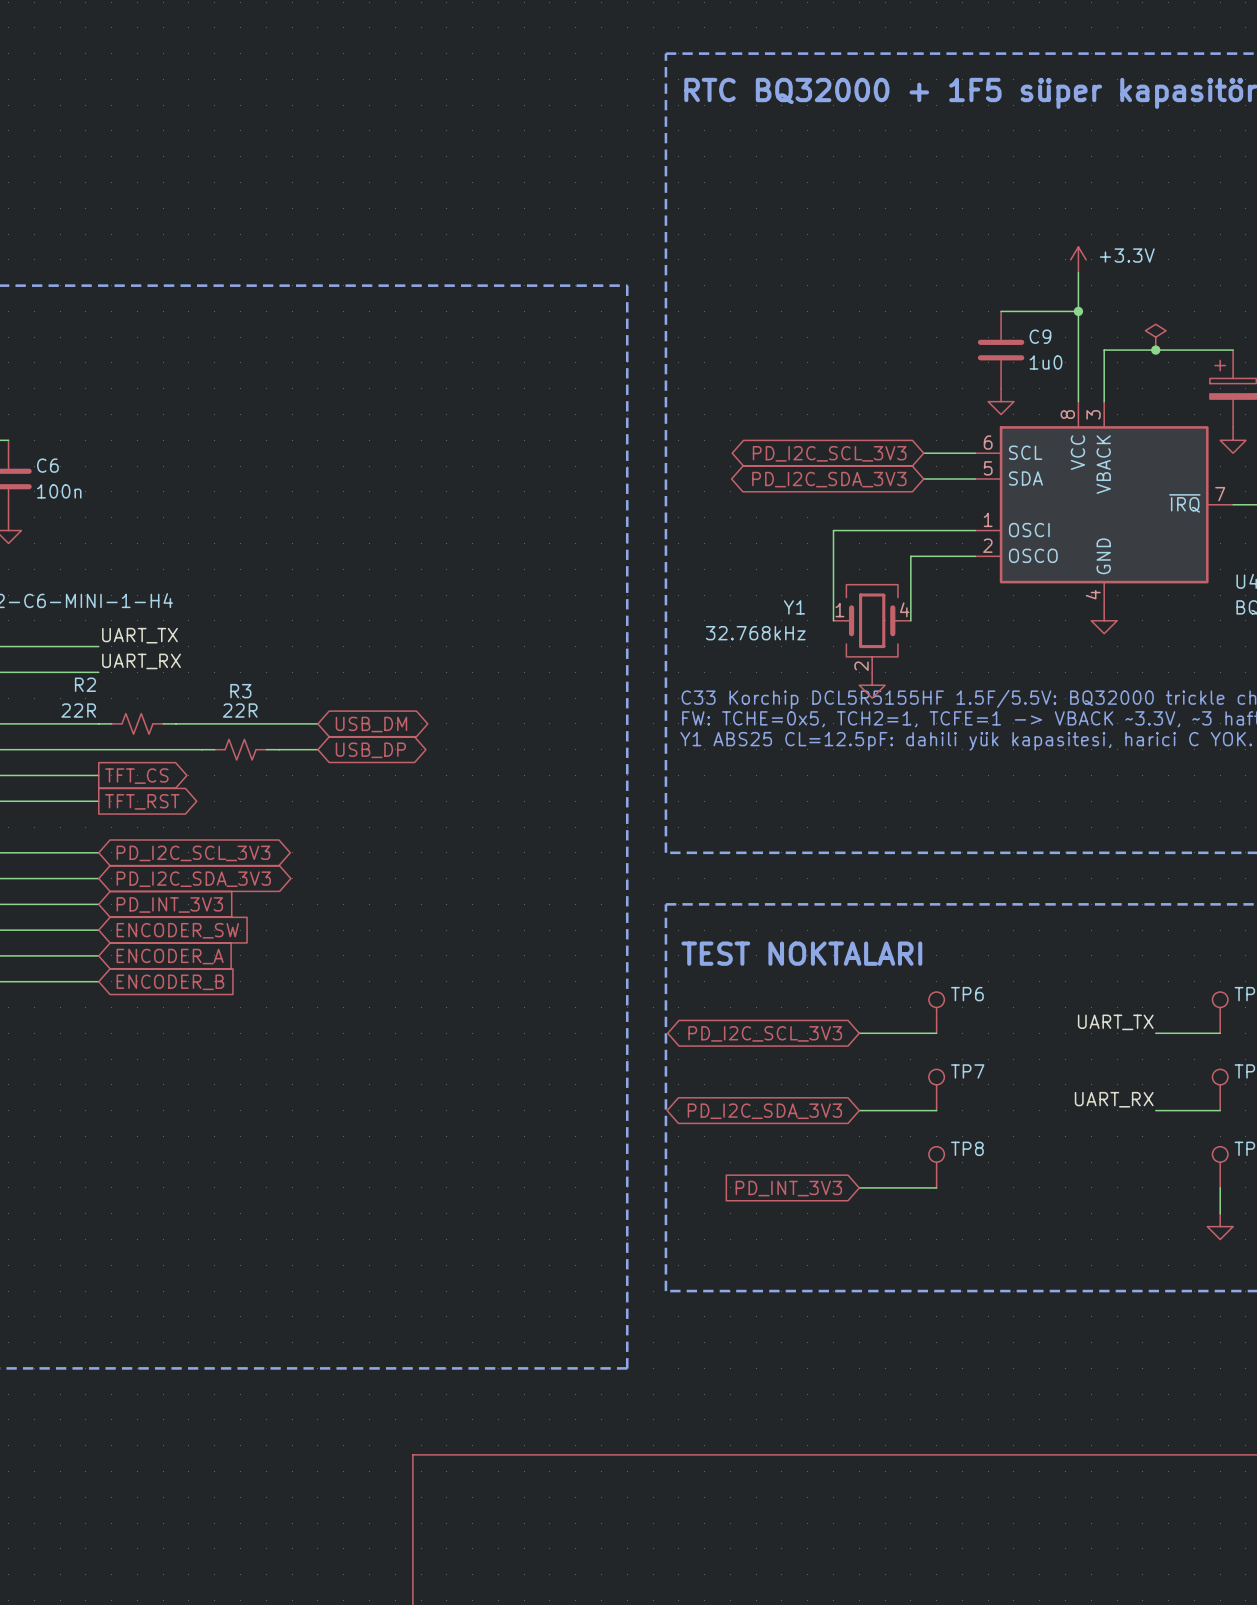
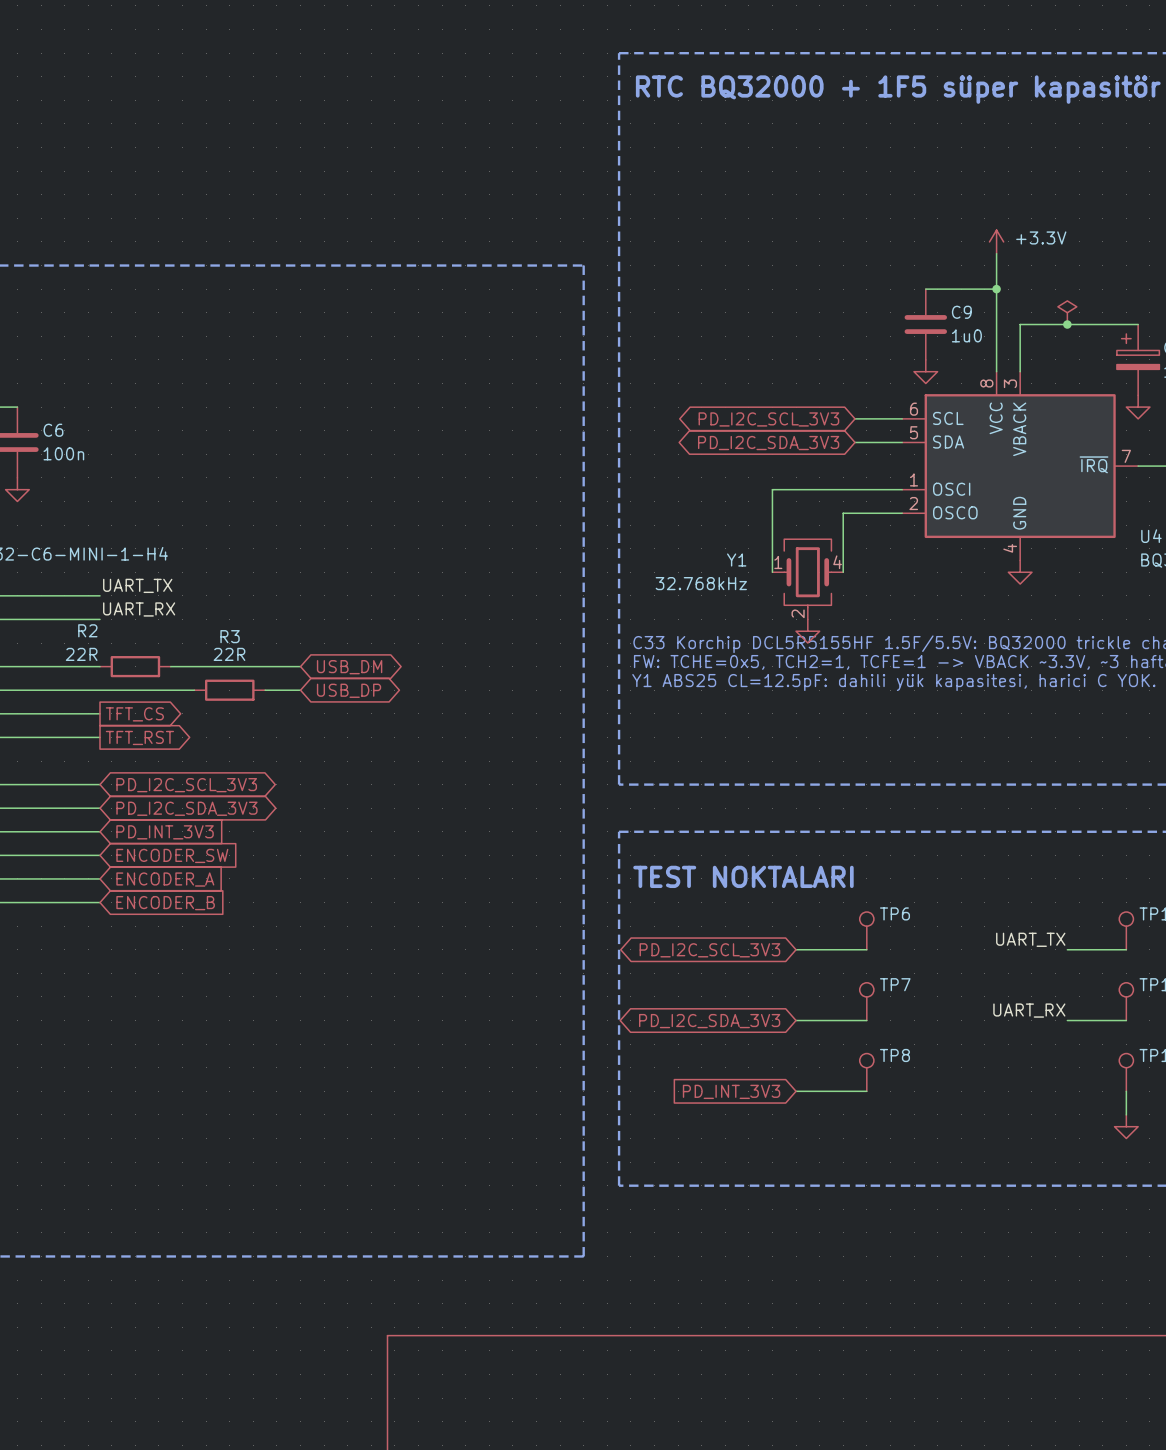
R2 symbol: [111, 713, 164, 735] -> [100, 656, 171, 678]
R3 symbol: [214, 739, 267, 760] -> [194, 679, 266, 701]

